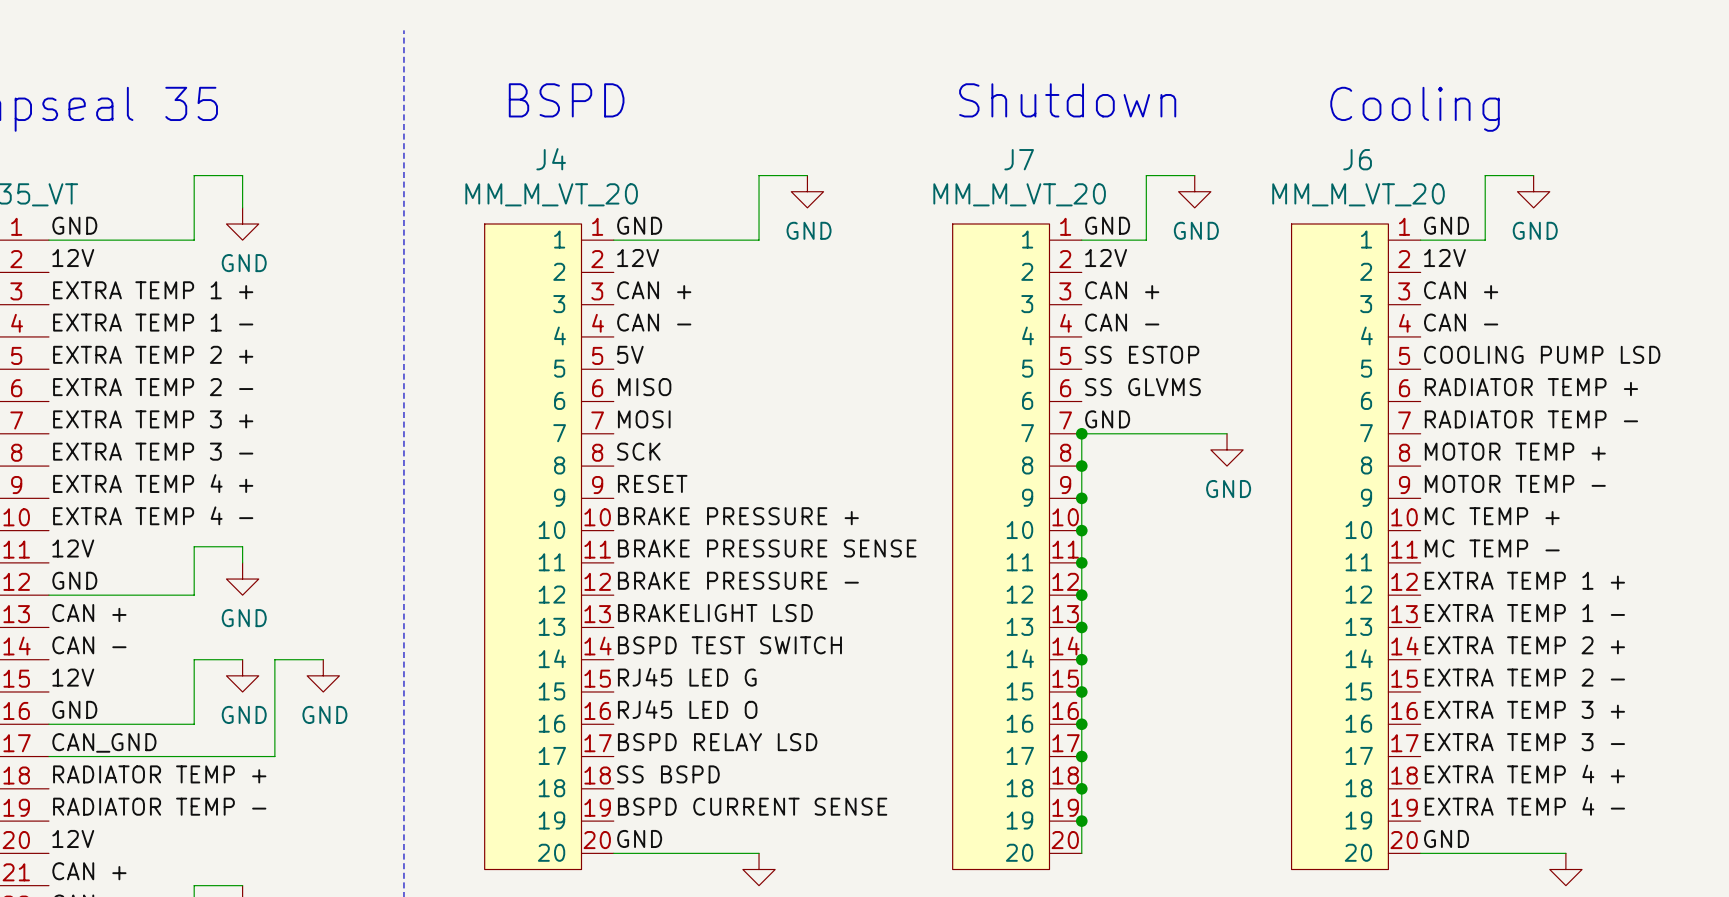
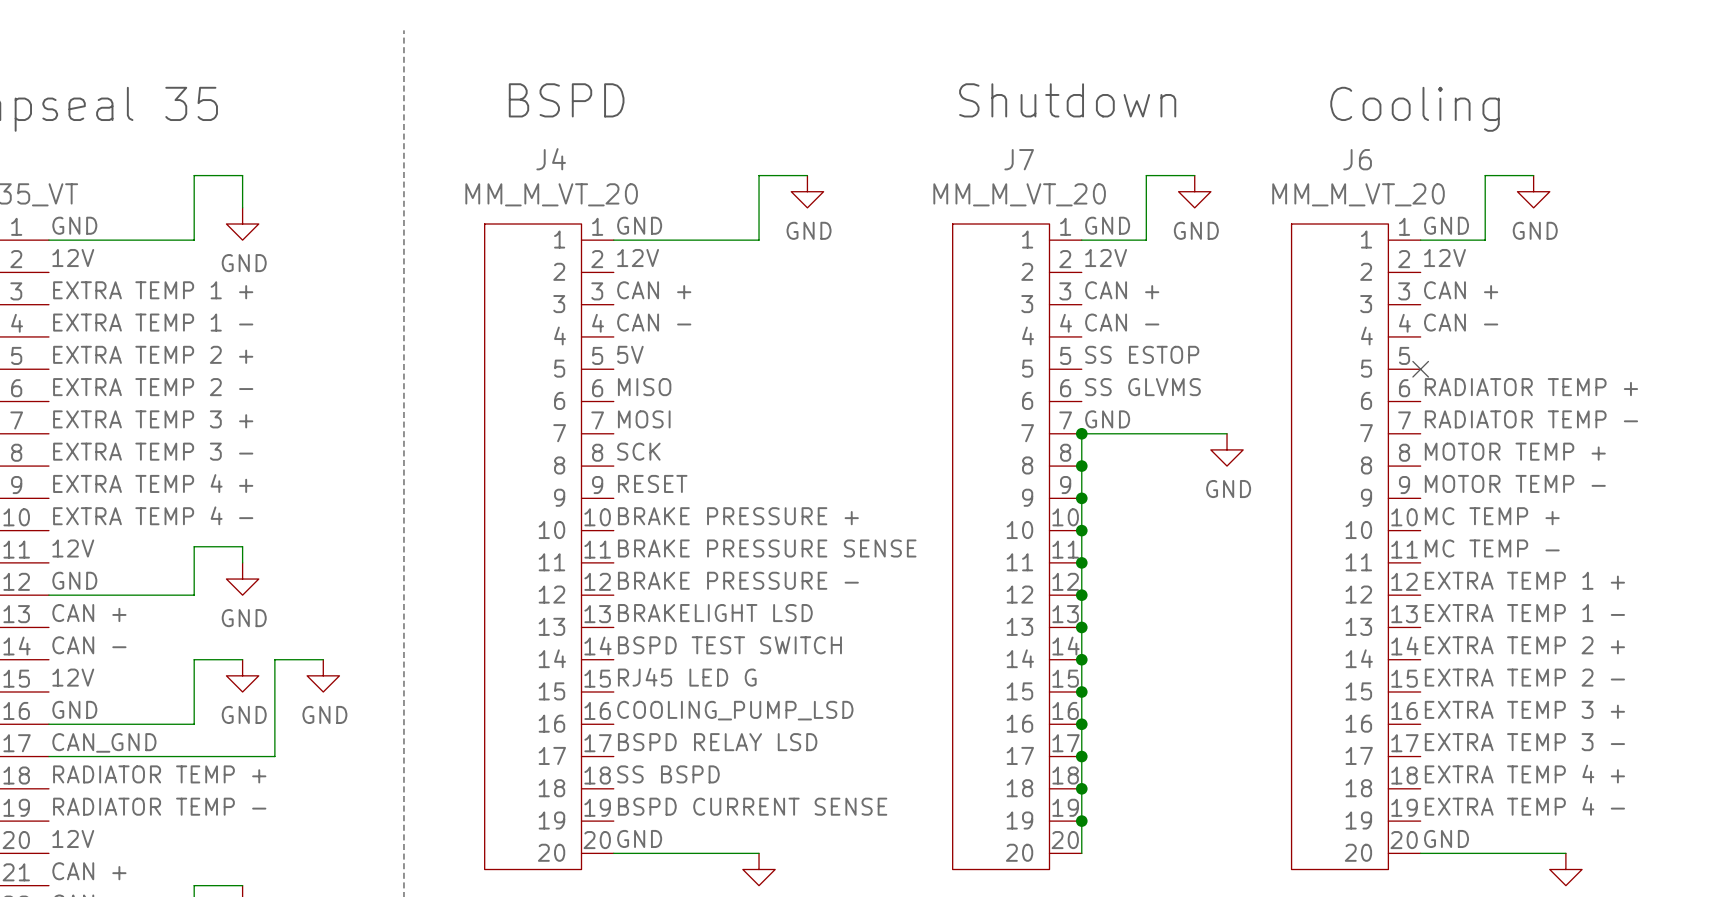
label: COOLING PUMP LSD (1542, 354) -> none
no-connect mark: none -> (1420, 369)
label: RJ45 LED O (687, 709) -> COOLING_PUMP_LSD (735, 710)

